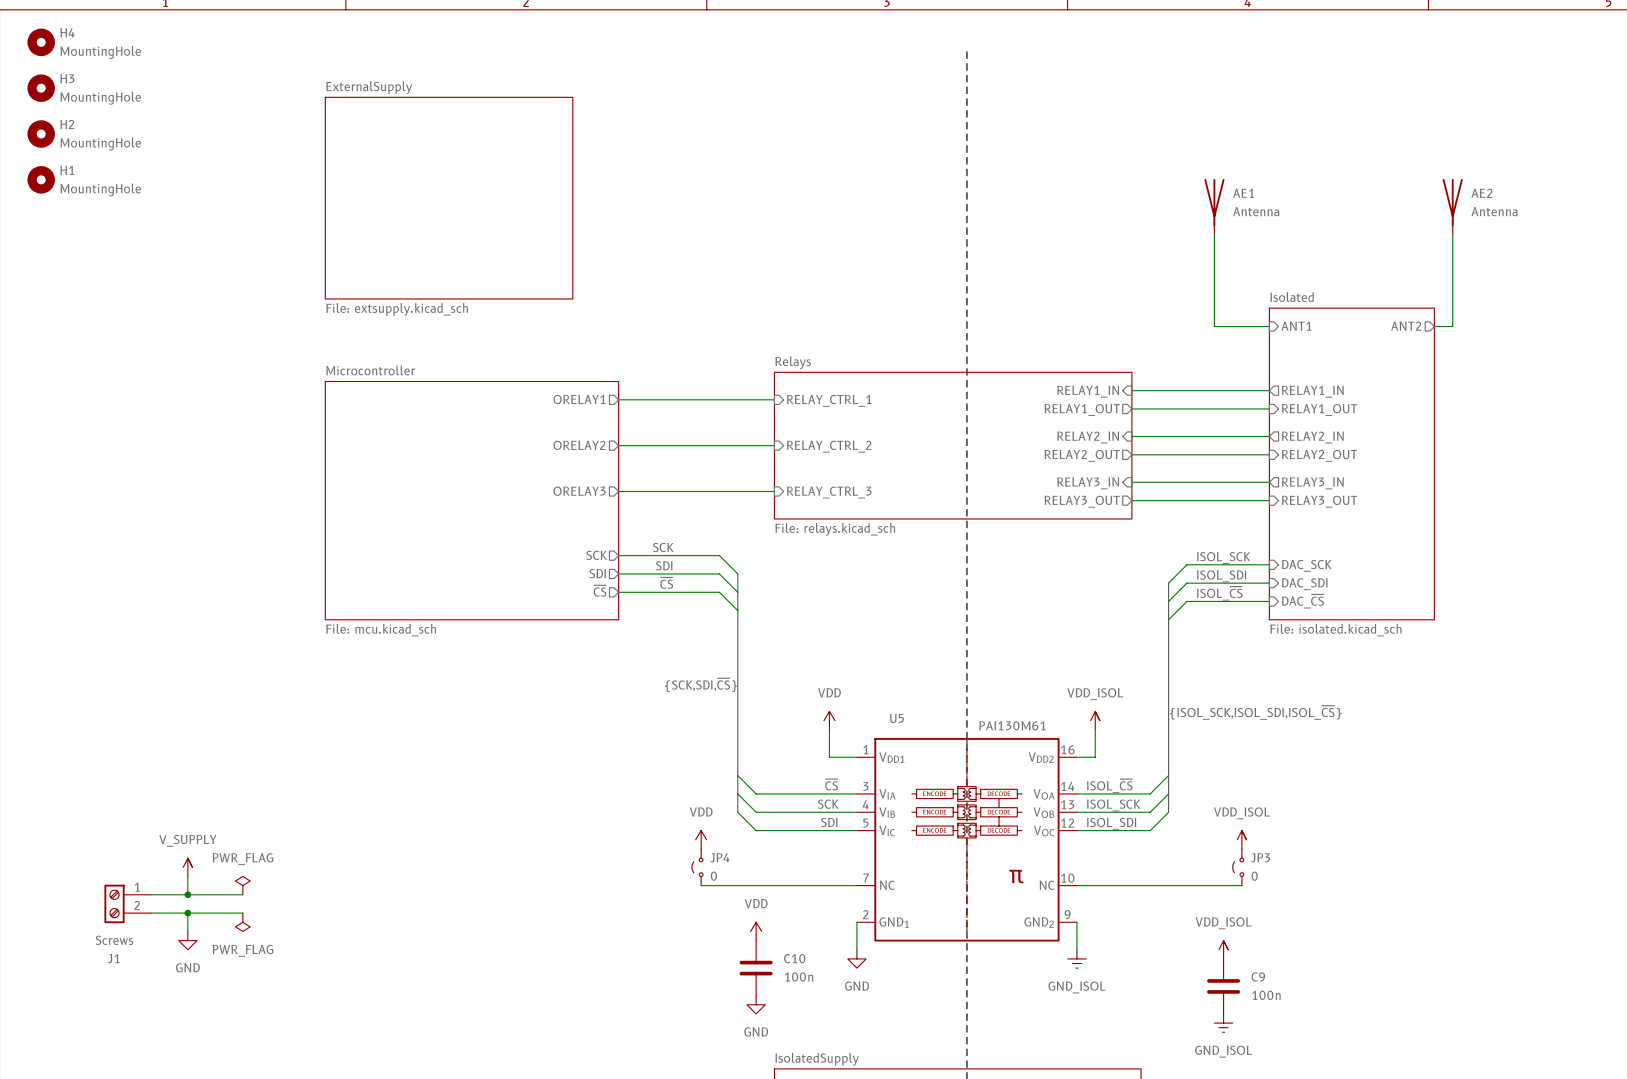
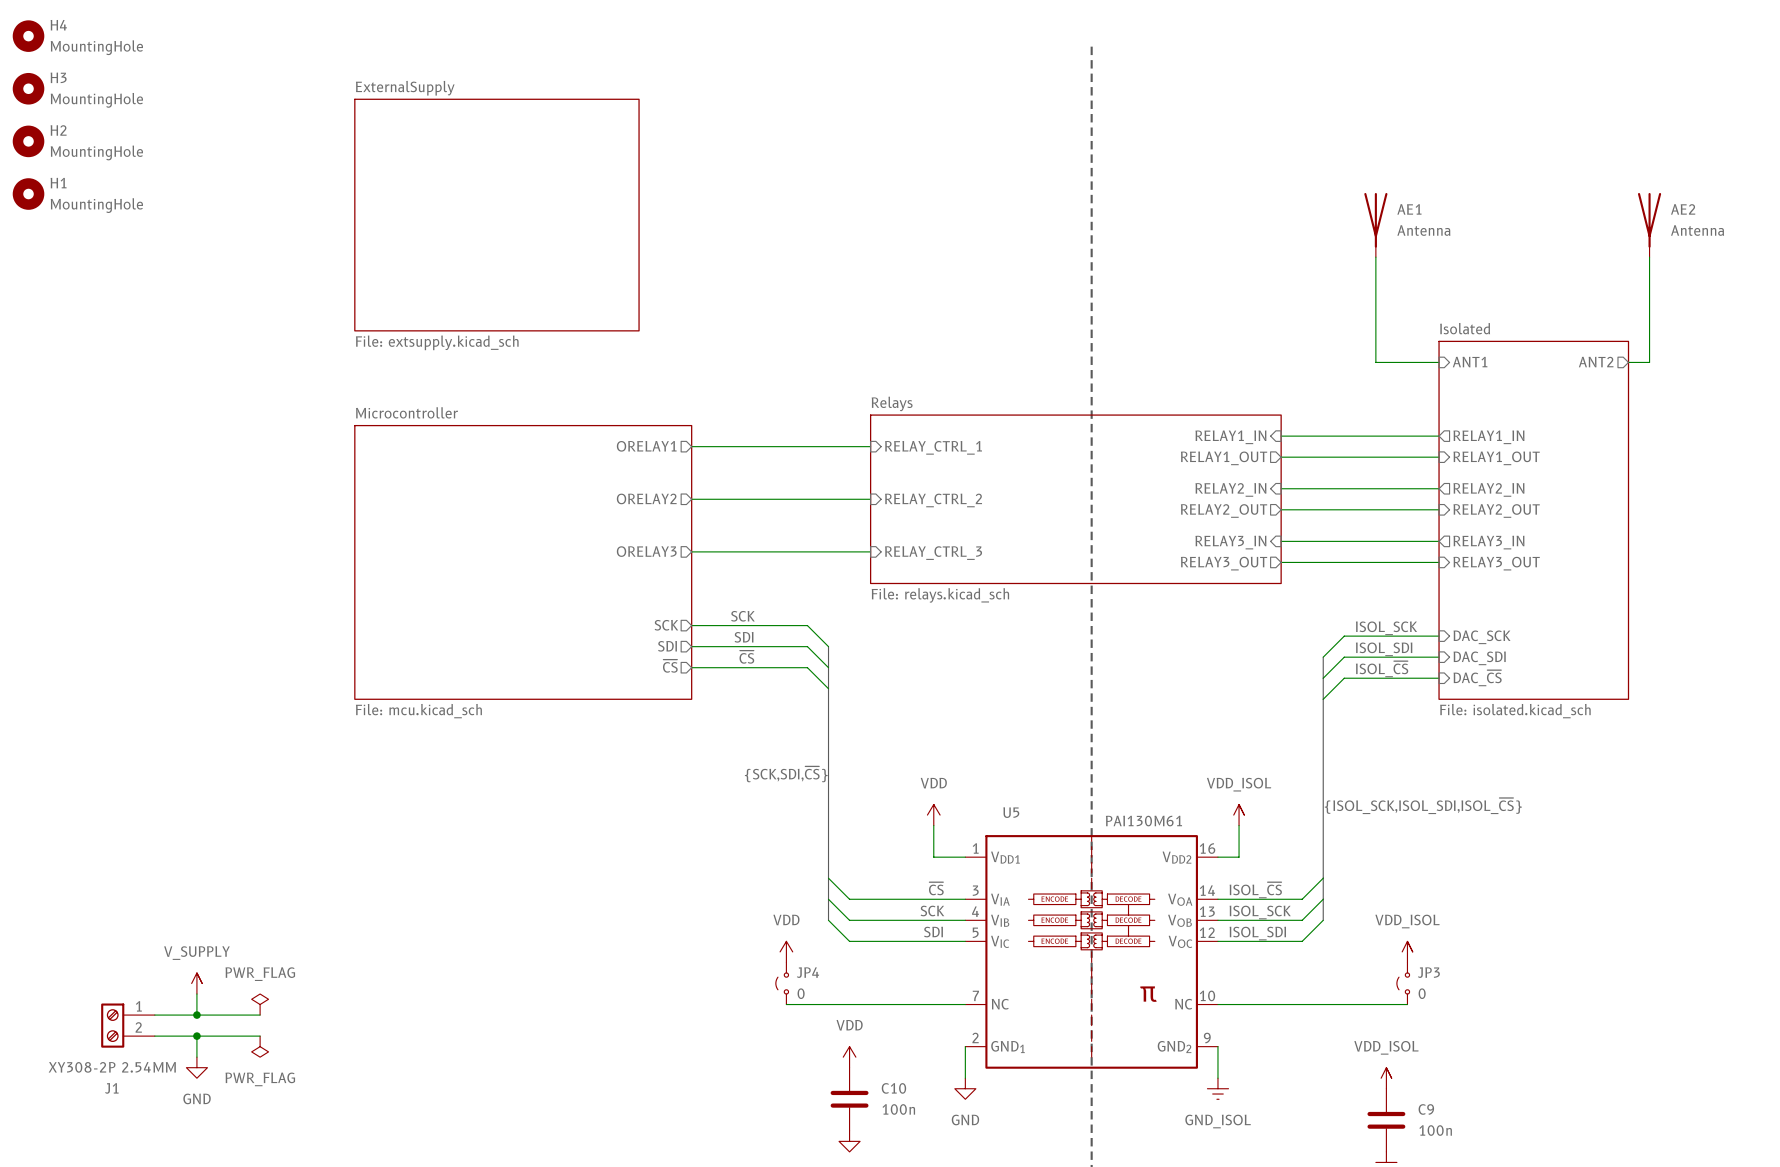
J1 value: Screws (114, 940) -> XY308-2P 2.54MM (112, 1067)

